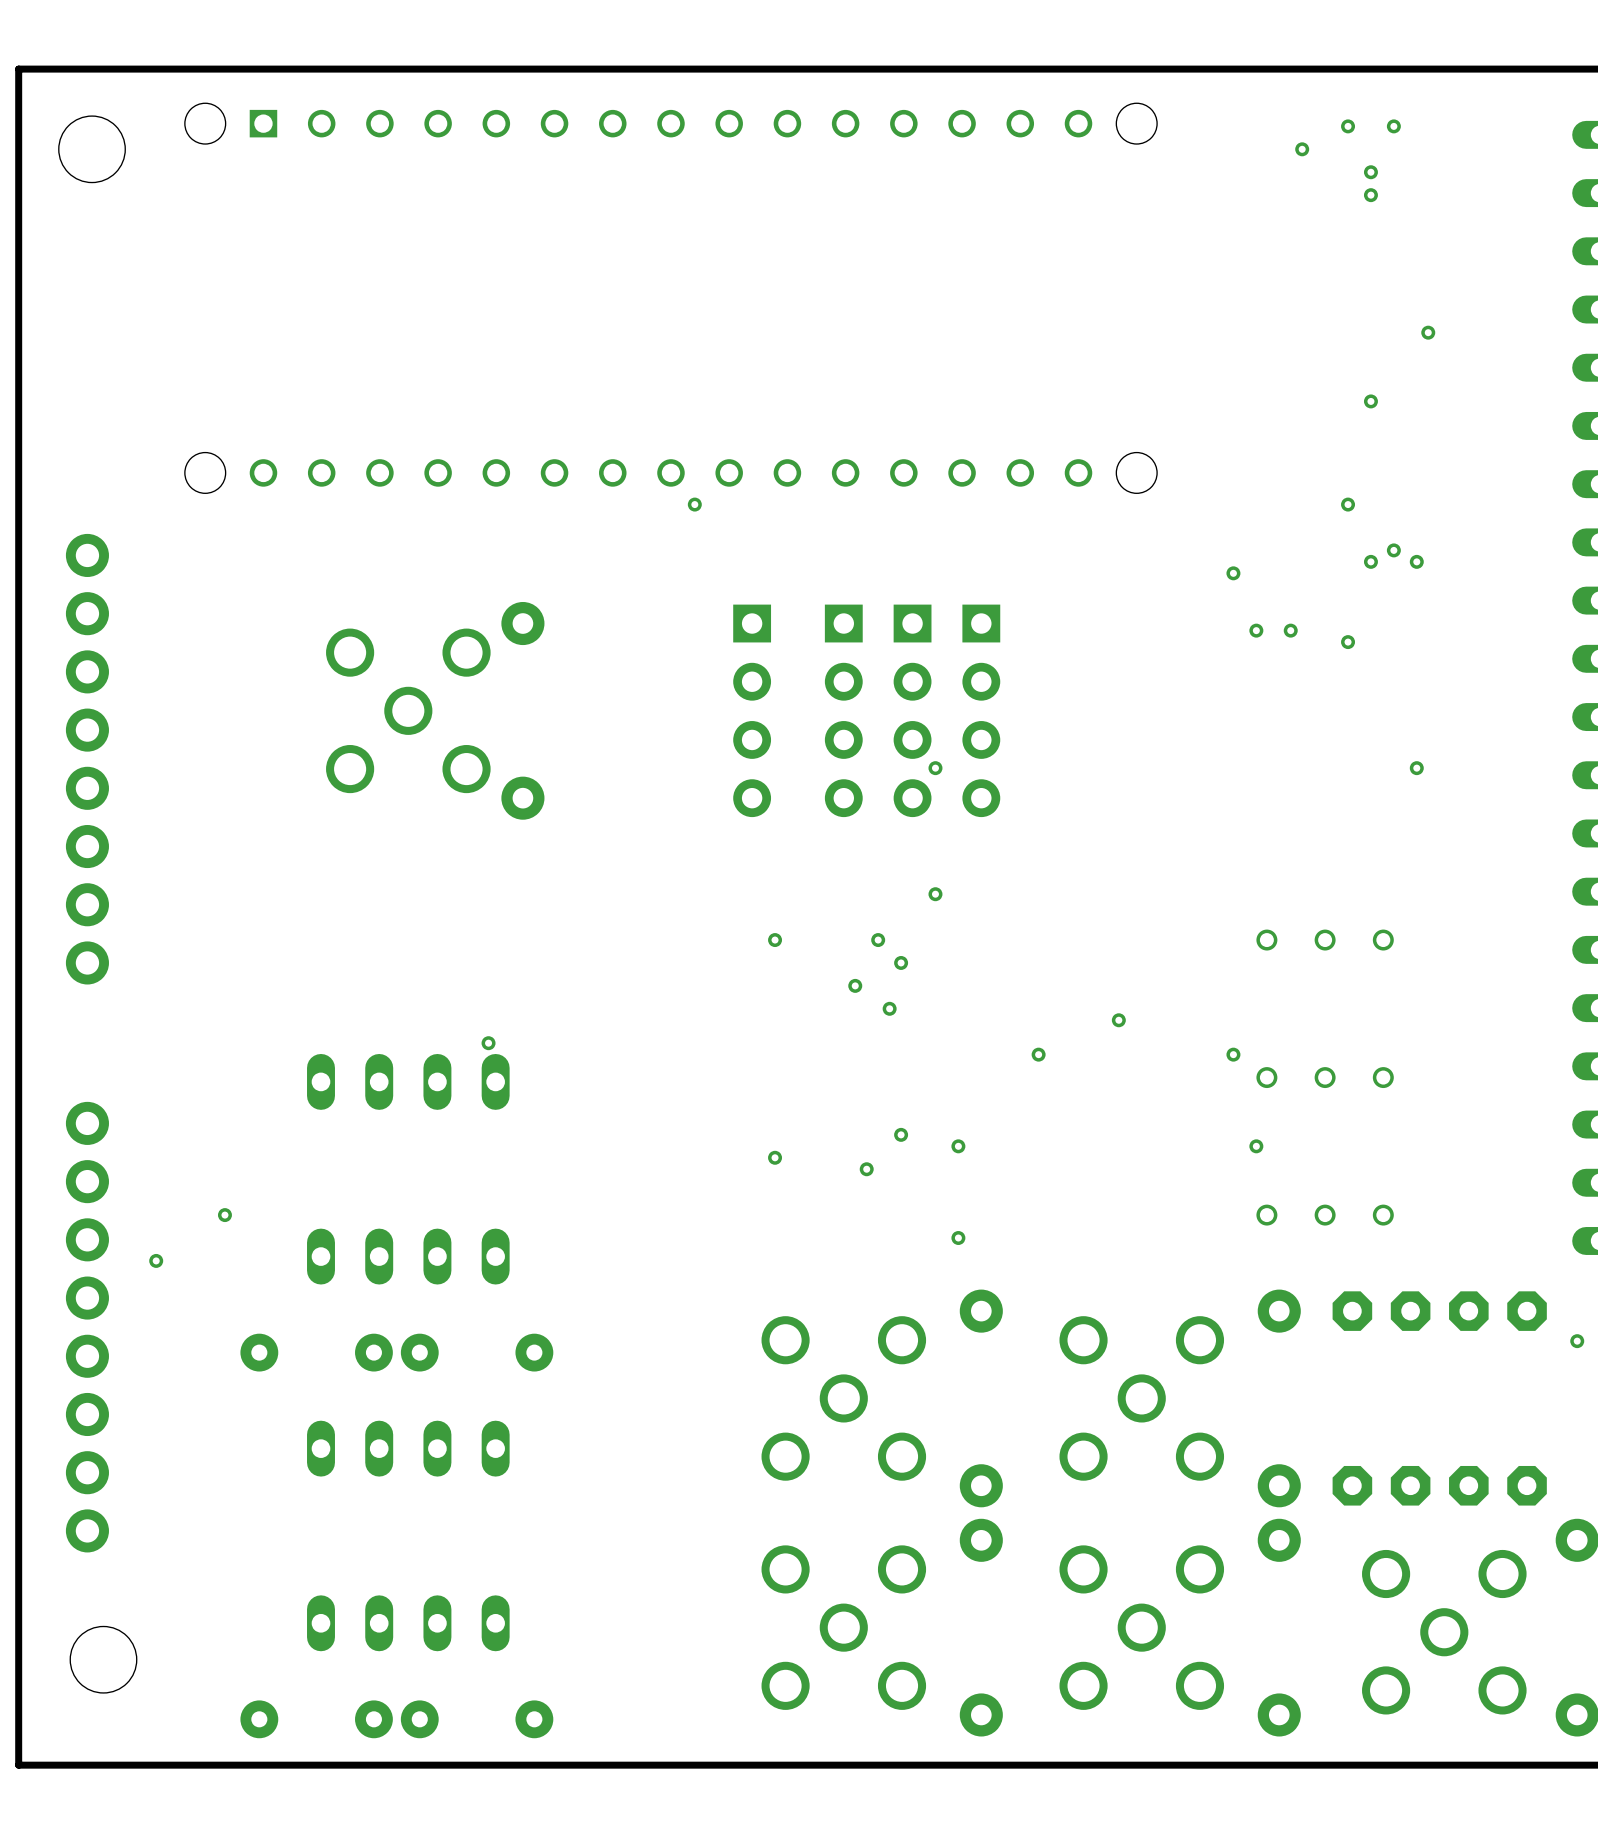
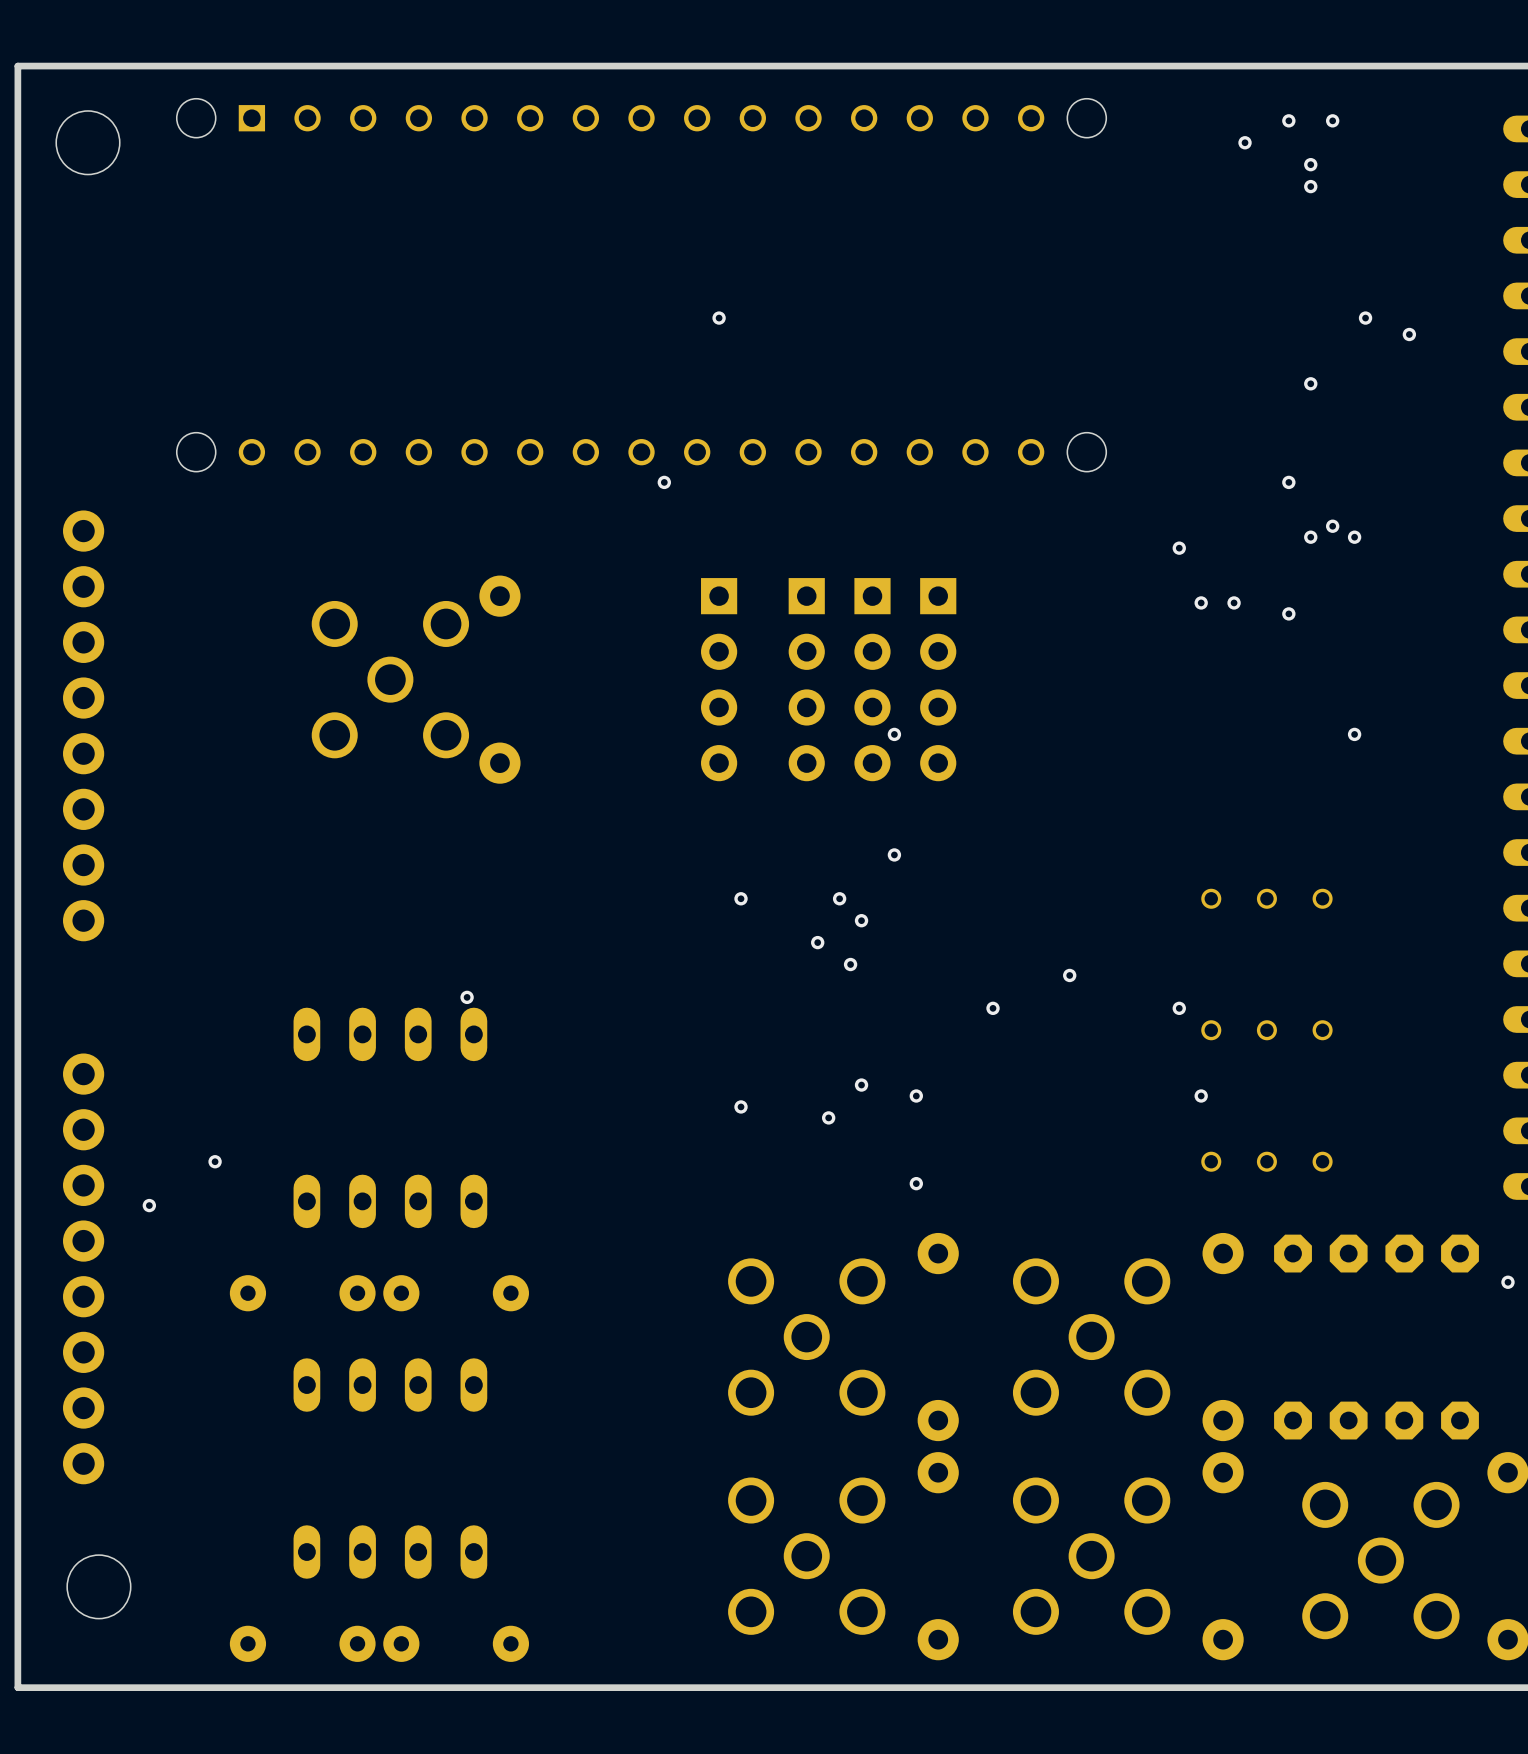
via: none -> (719, 318)
via: none -> (1409, 334)

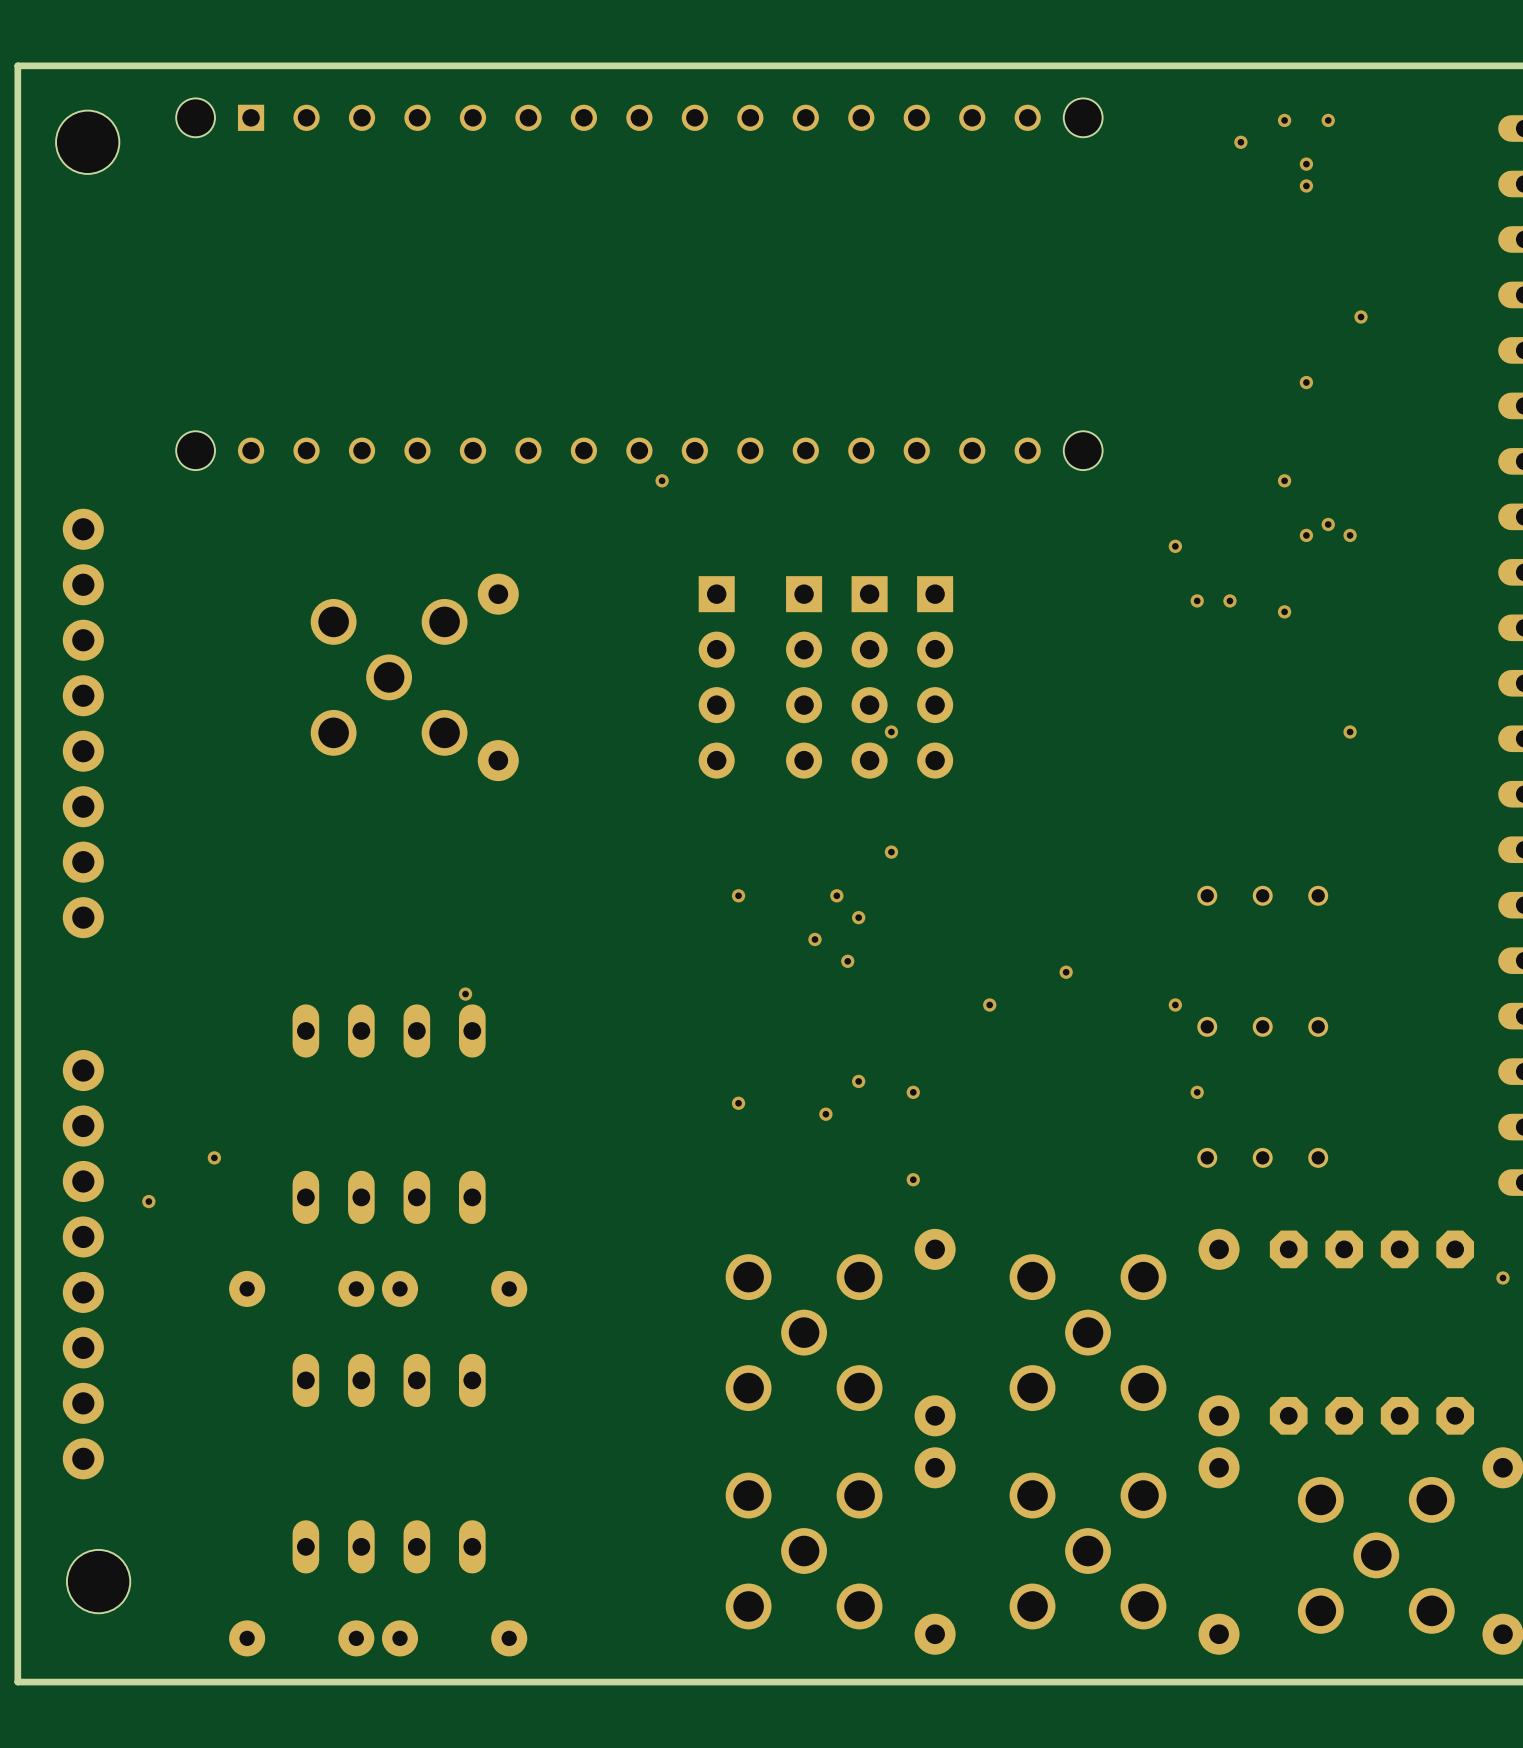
via: (719, 318) -> none
via: (1409, 334) -> none

